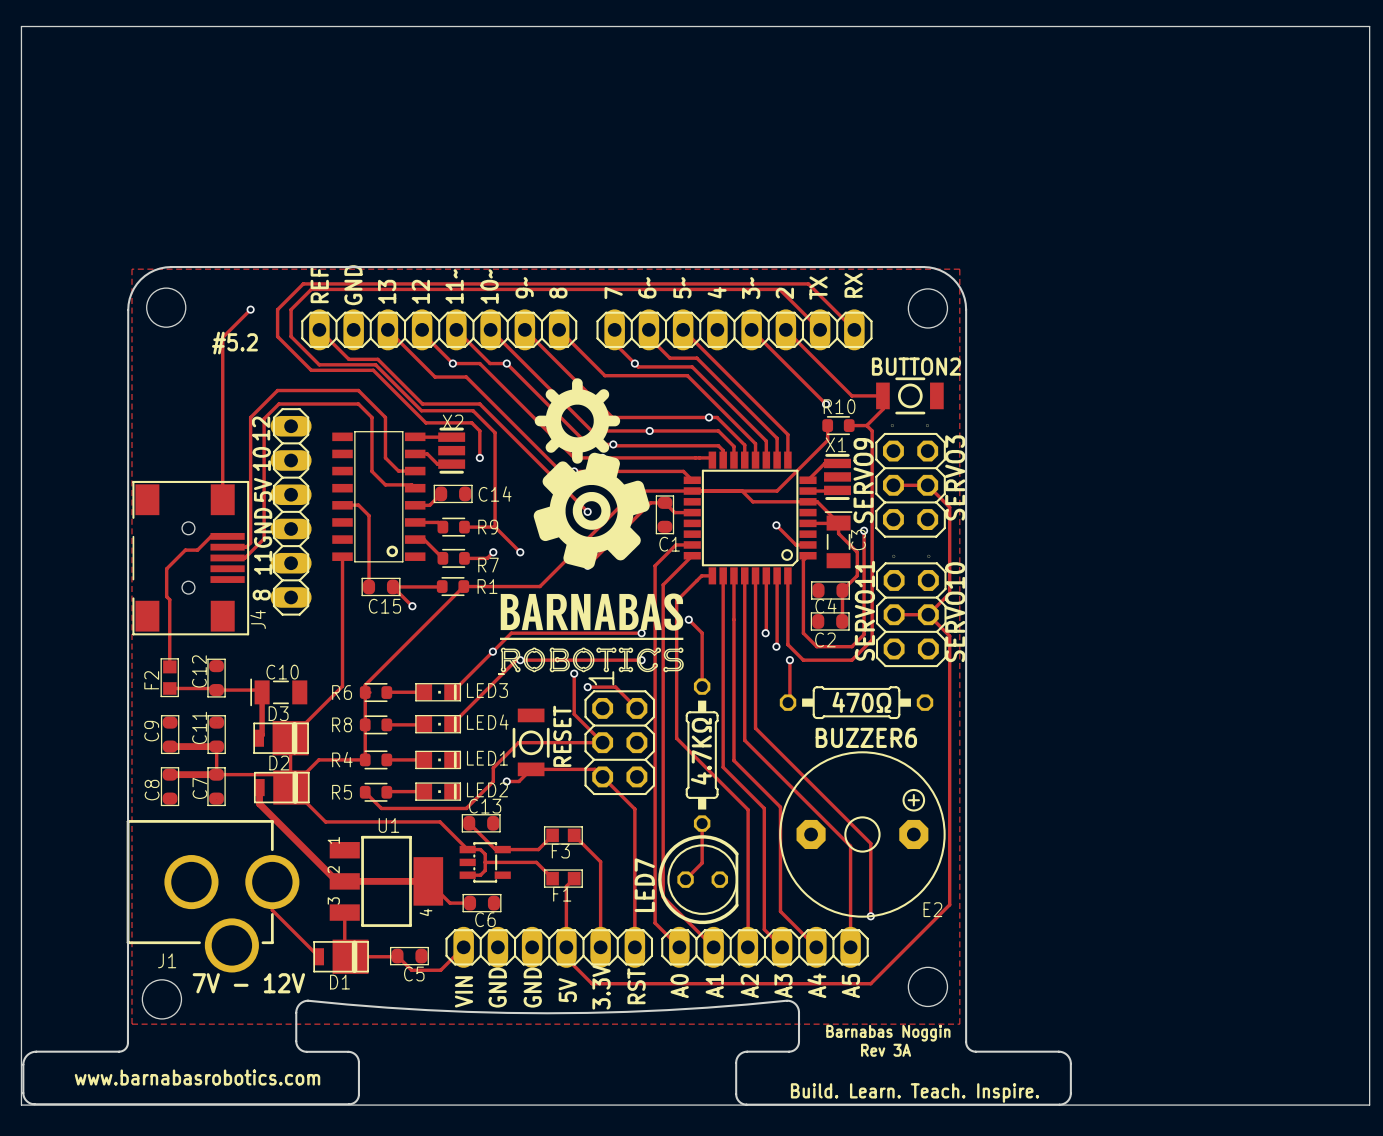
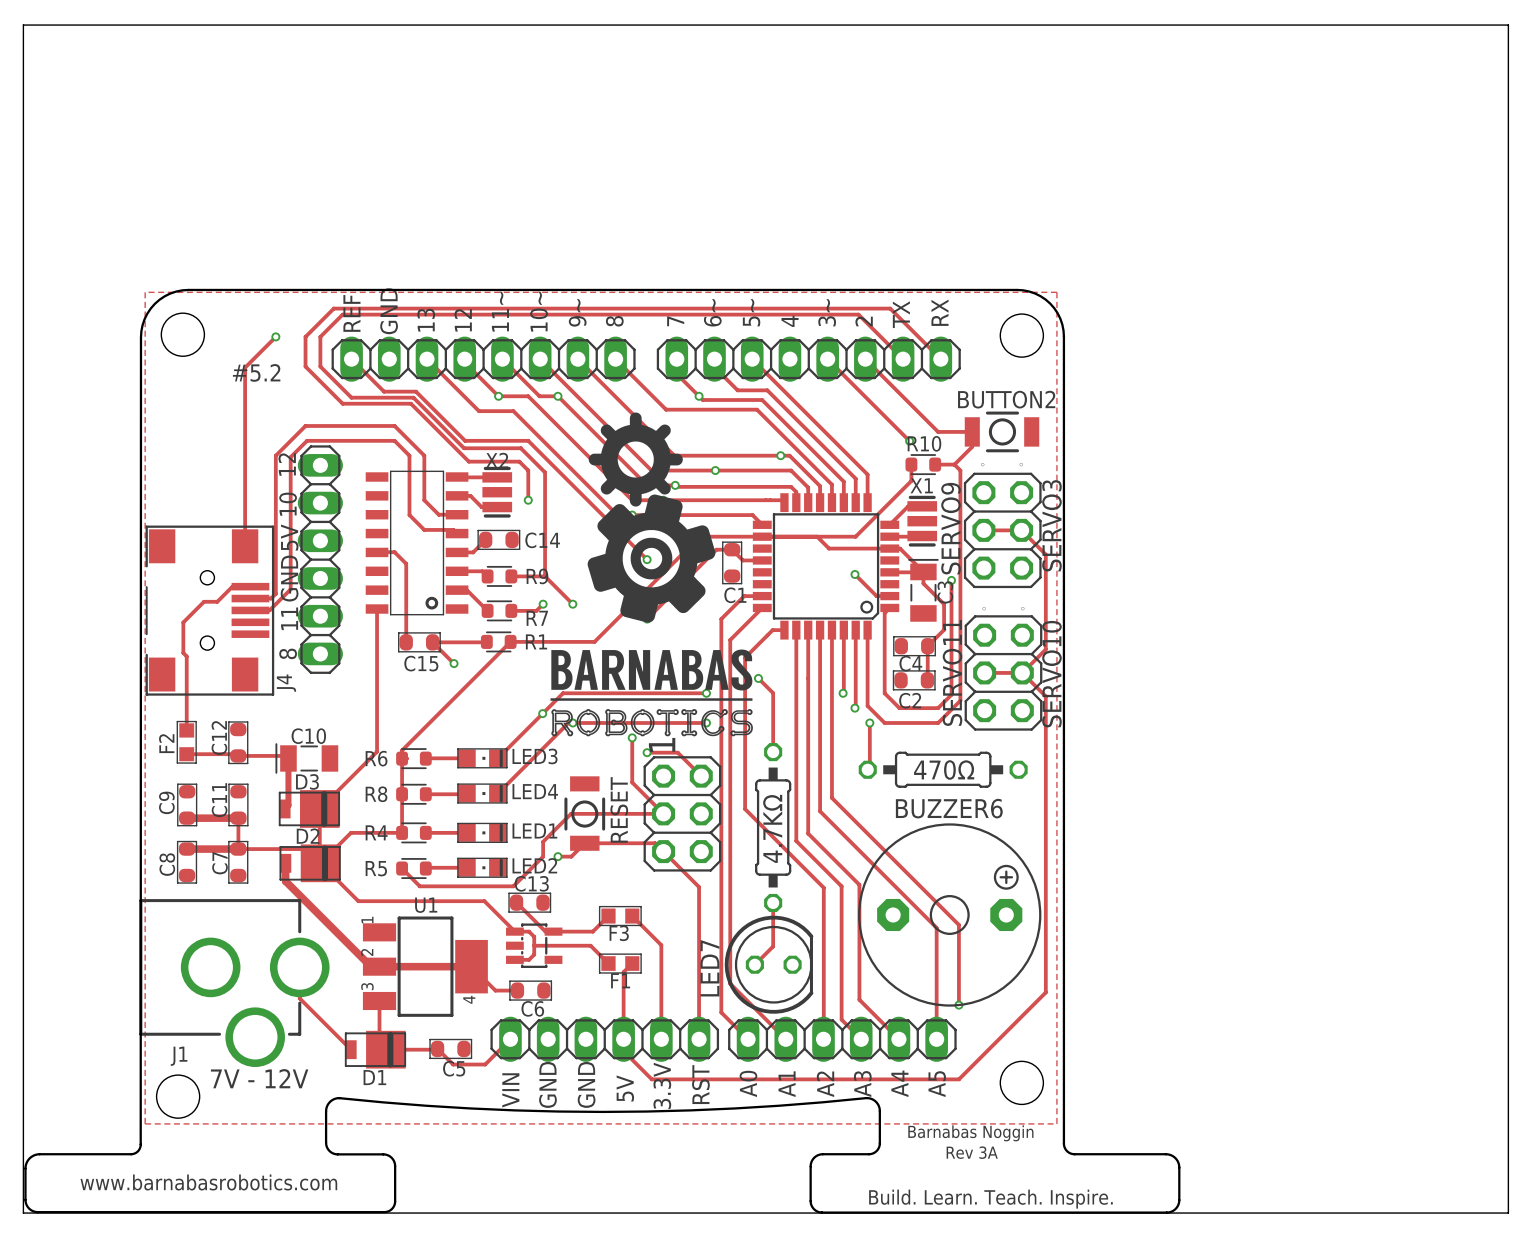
E2 name: E2 (932, 909) -> none

